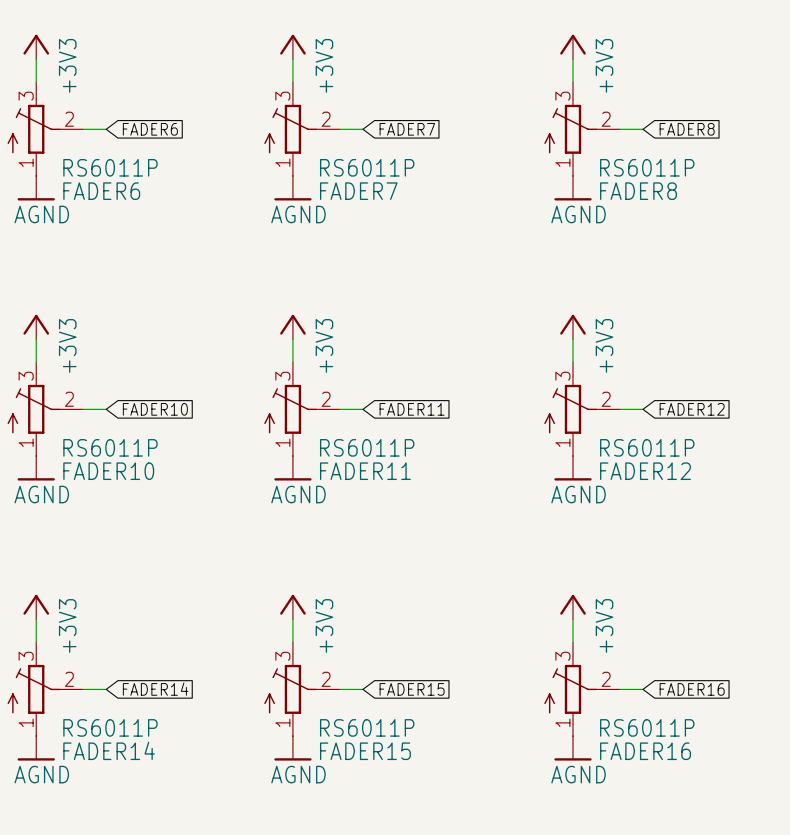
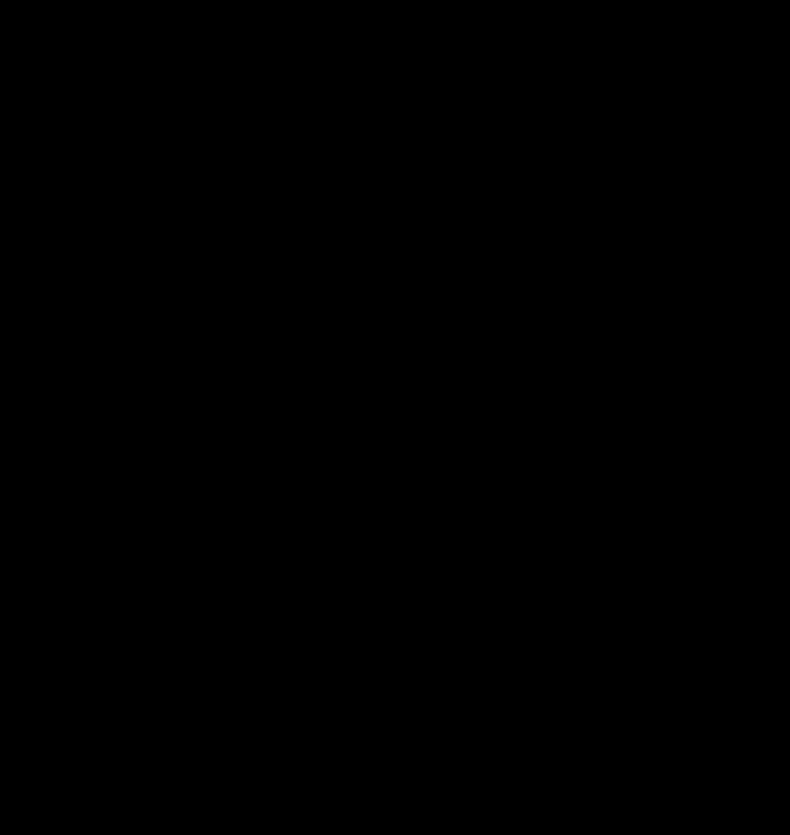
power symbol: +3V3 (36, 47) -> none
power symbol: +3V3 (292, 47) -> none
power symbol: +3V3 (573, 47) -> none
wire: (36, 59) (36, 82) -> none
wire: (292, 59) (292, 82) -> none
wire: (573, 59) (573, 82) -> none
FADER6: RS6011P (45, 129) -> none
wire: (82, 129) (106, 129) -> none
global label: FADER6 (150, 129) -> none
FADER7: RS6011P (301, 129) -> none
wire: (339, 129) (362, 129) -> none
global label: FADER7 (407, 129) -> none
FADER8: RS6011P (581, 129) -> none
wire: (619, 129) (643, 129) -> none
global label: FADER8 (687, 129) -> none
power symbol: AGND (36, 188) -> none
power symbol: AGND (292, 188) -> none
power symbol: AGND (573, 188) -> none
power symbol: +3V3 (36, 327) -> none
power symbol: +3V3 (292, 327) -> none
power symbol: +3V3 (573, 327) -> none
wire: (36, 339) (36, 362) -> none
wire: (292, 339) (292, 362) -> none
wire: (573, 339) (573, 362) -> none
FADER10: RS6011P (45, 409) -> none
wire: (82, 409) (106, 409) -> none
global label: FADER10 (155, 409) -> none
FADER11: RS6011P (301, 409) -> none
wire: (339, 409) (362, 409) -> none
global label: FADER11 (412, 409) -> none
FADER12: RS6011P (581, 409) -> none
wire: (619, 409) (643, 409) -> none
global label: FADER12 (692, 409) -> none
power symbol: AGND (36, 468) -> none
power symbol: AGND (292, 468) -> none
power symbol: AGND (573, 468) -> none
power symbol: +3V3 (36, 607) -> none
power symbol: +3V3 (292, 607) -> none
power symbol: +3V3 (573, 607) -> none
wire: (36, 619) (36, 642) -> none
wire: (292, 619) (292, 642) -> none
wire: (573, 619) (573, 642) -> none
FADER14: RS6011P (45, 689) -> none
wire: (82, 689) (106, 689) -> none
global label: FADER14 (155, 689) -> none
FADER15: RS6011P (301, 689) -> none
wire: (339, 689) (362, 689) -> none
global label: FADER15 (412, 689) -> none
FADER16: RS6011P (581, 689) -> none
wire: (619, 689) (643, 689) -> none
global label: FADER16 (692, 689) -> none
power symbol: AGND (36, 748) -> none
power symbol: AGND (292, 748) -> none
power symbol: AGND (573, 748) -> none

